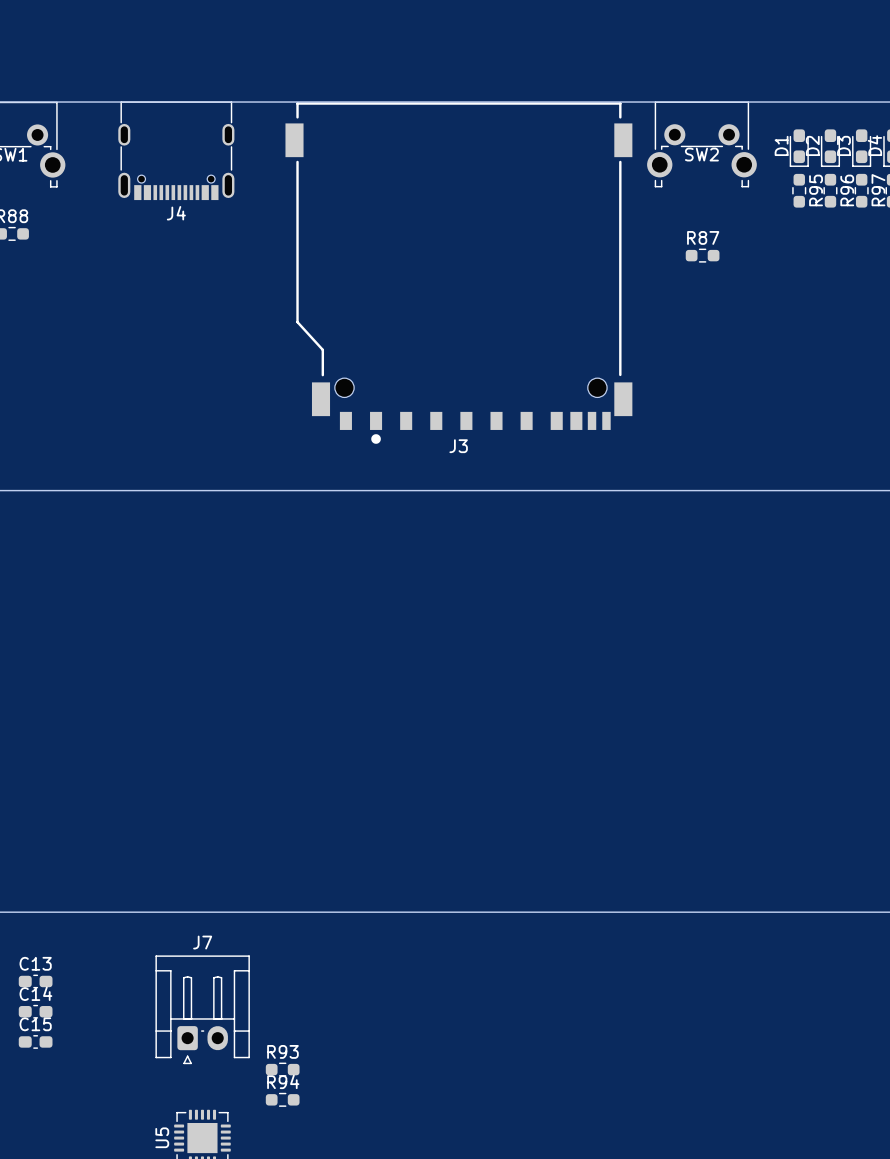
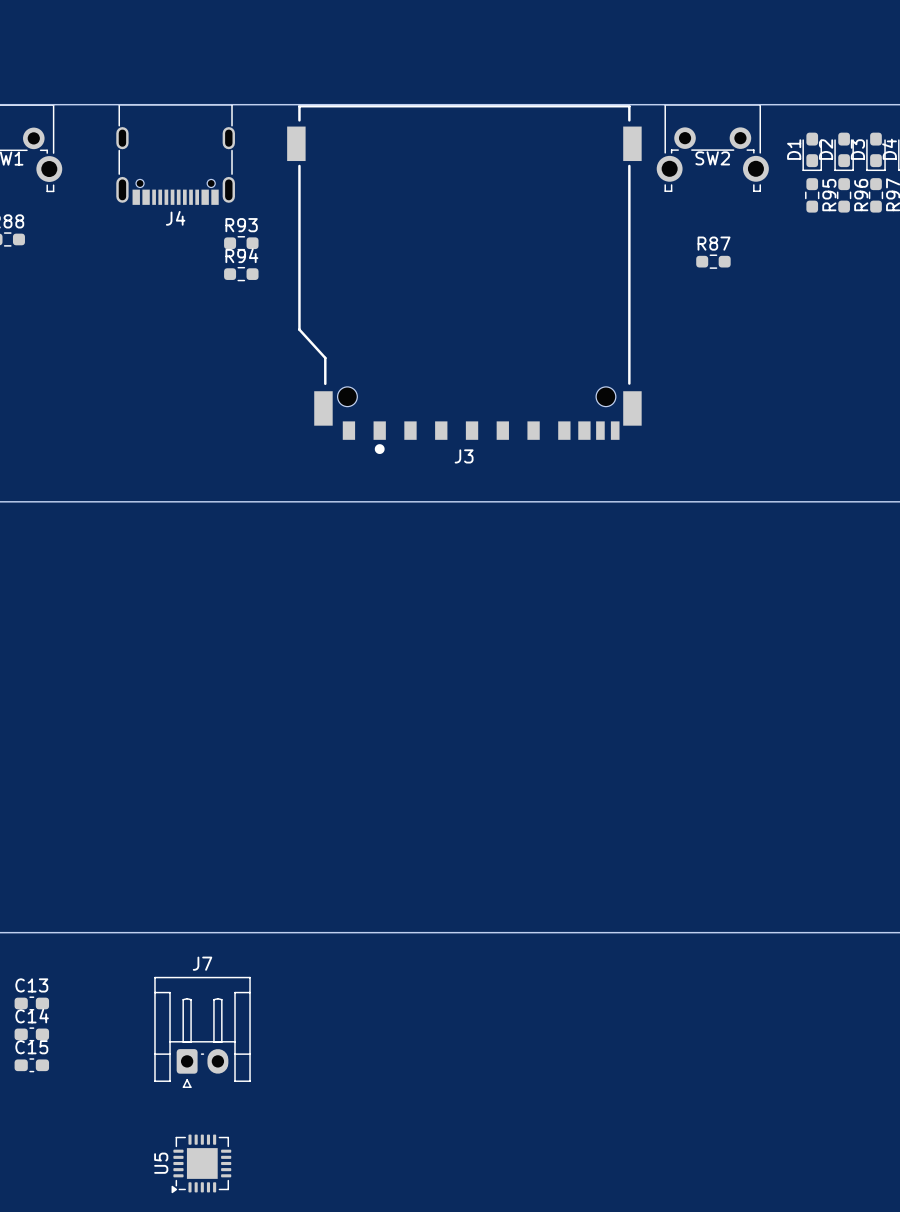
R93 position: (282, 1069) -> (241, 243)
R94 position: (282, 1099) -> (241, 274)

